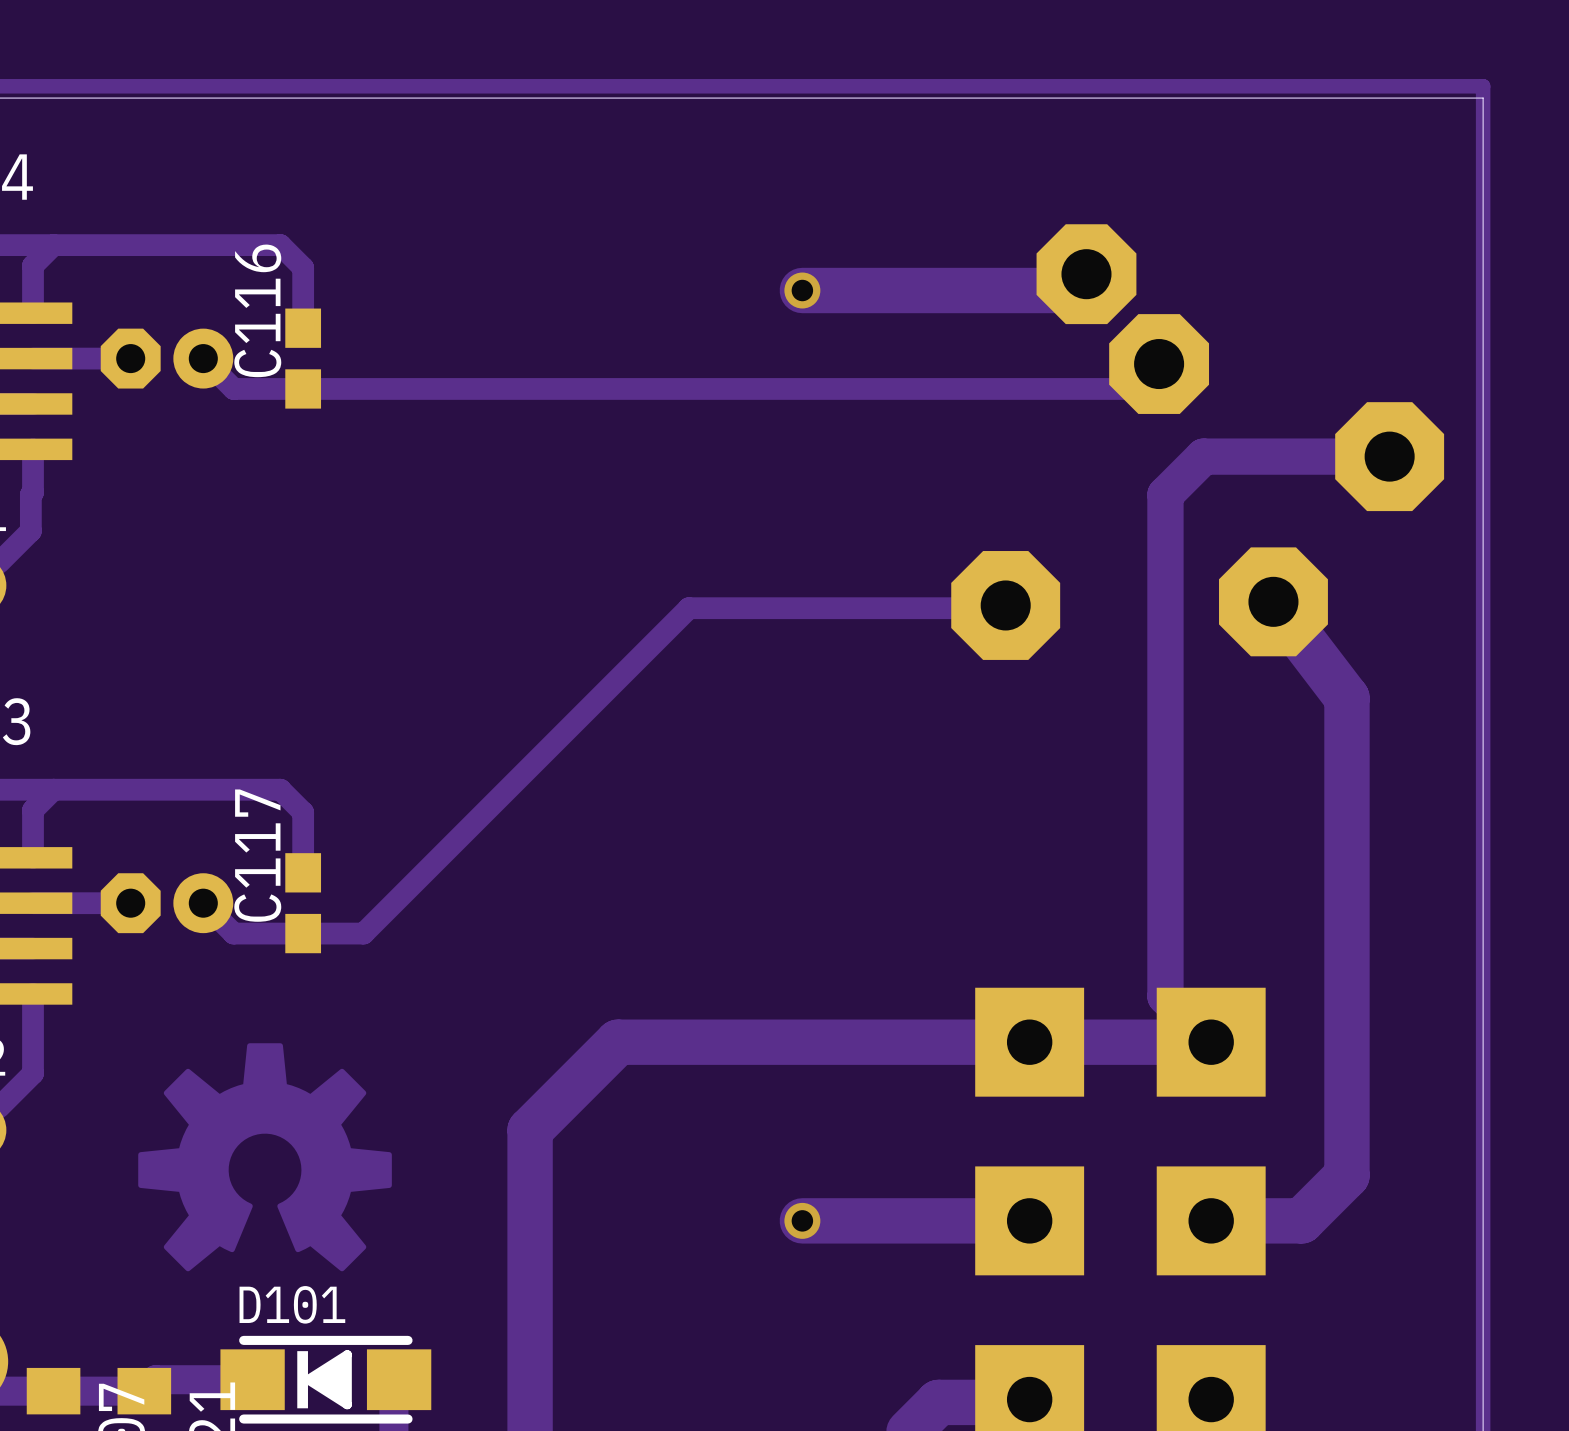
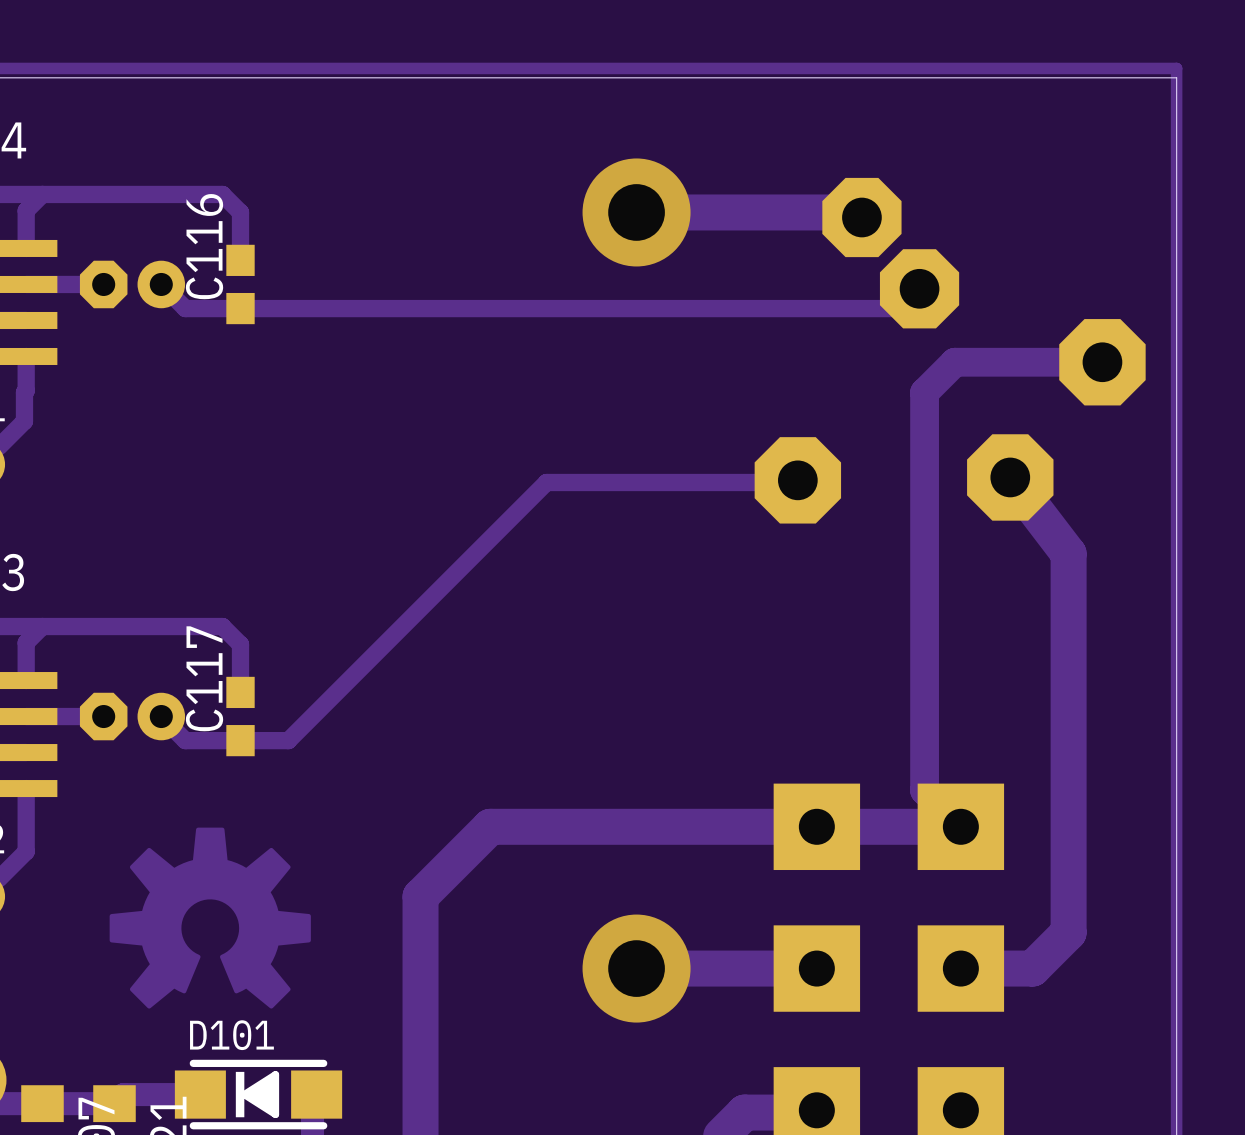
track: none -> (874, 212) (636, 212)
via size: [784, 272, 821, 309] -> [582, 158, 691, 267]
track: (1086, 274) (1070, 290) (802, 290) -> none
via size: [784, 1202, 821, 1239] -> [582, 914, 691, 1023]

